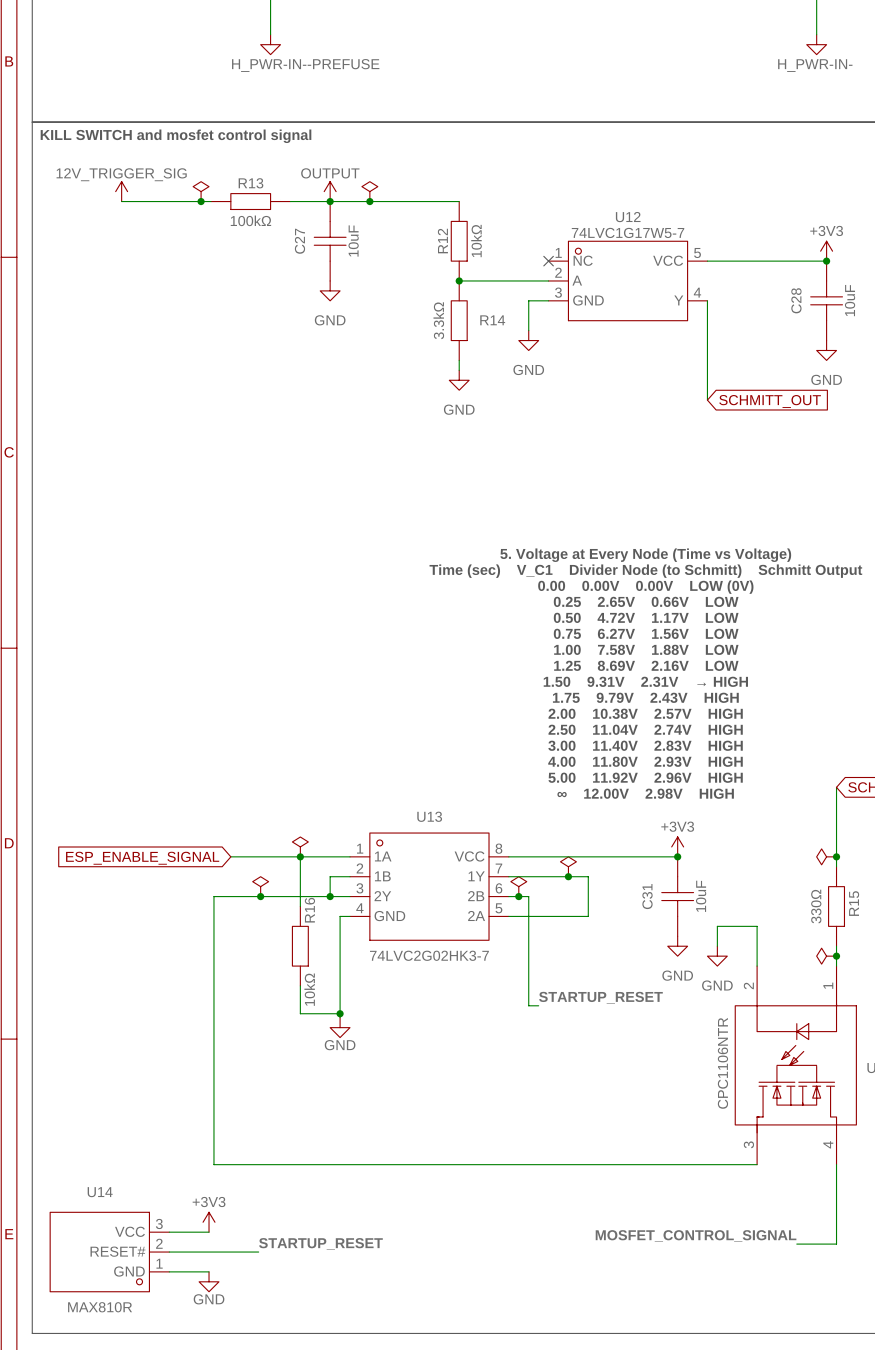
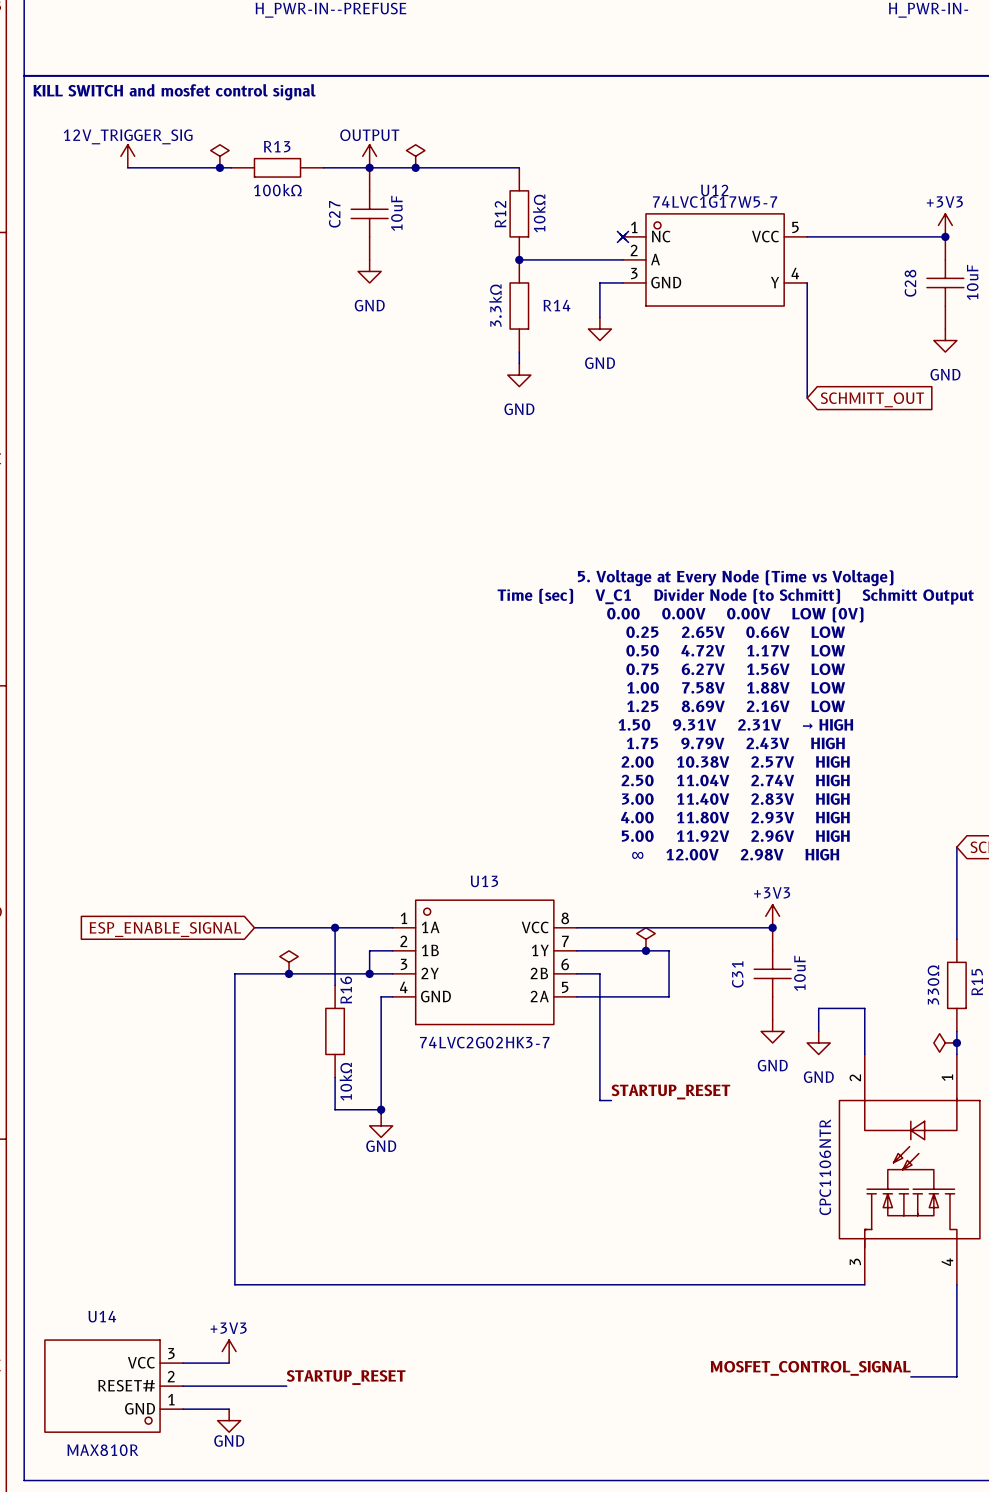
U12 symbol: [548, 241, 708, 321] -> [620, 213, 808, 307]
power symbol: (300, 846) -> none
power symbol: (826, 856) -> none
junction: (836, 856) -> none
power symbol: (518, 886) -> none
junction: (518, 896) -> none

